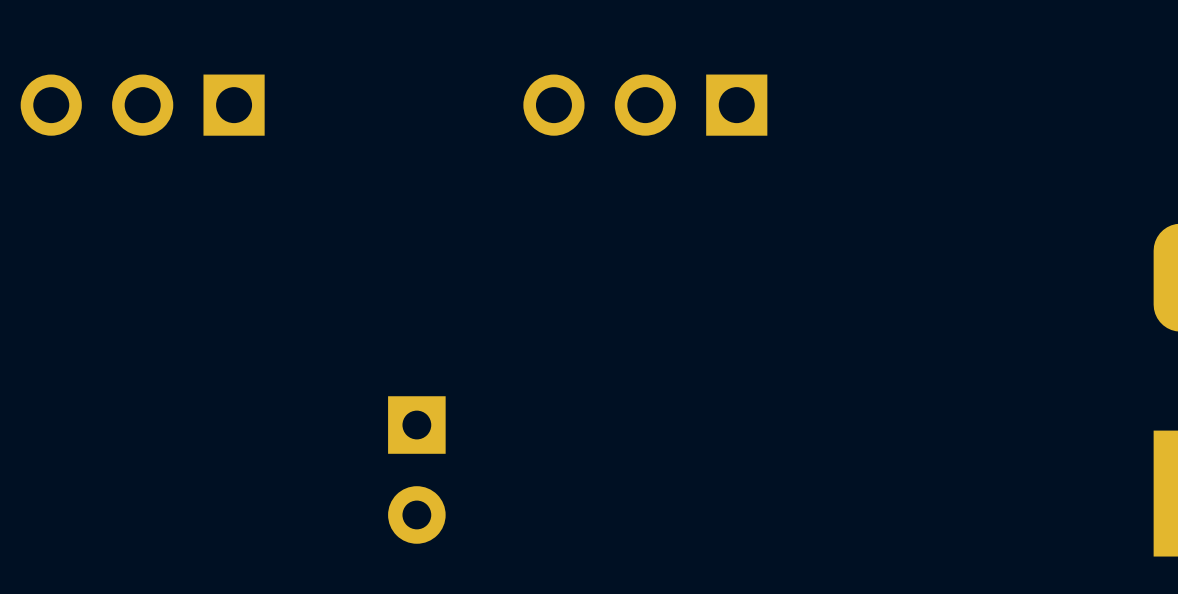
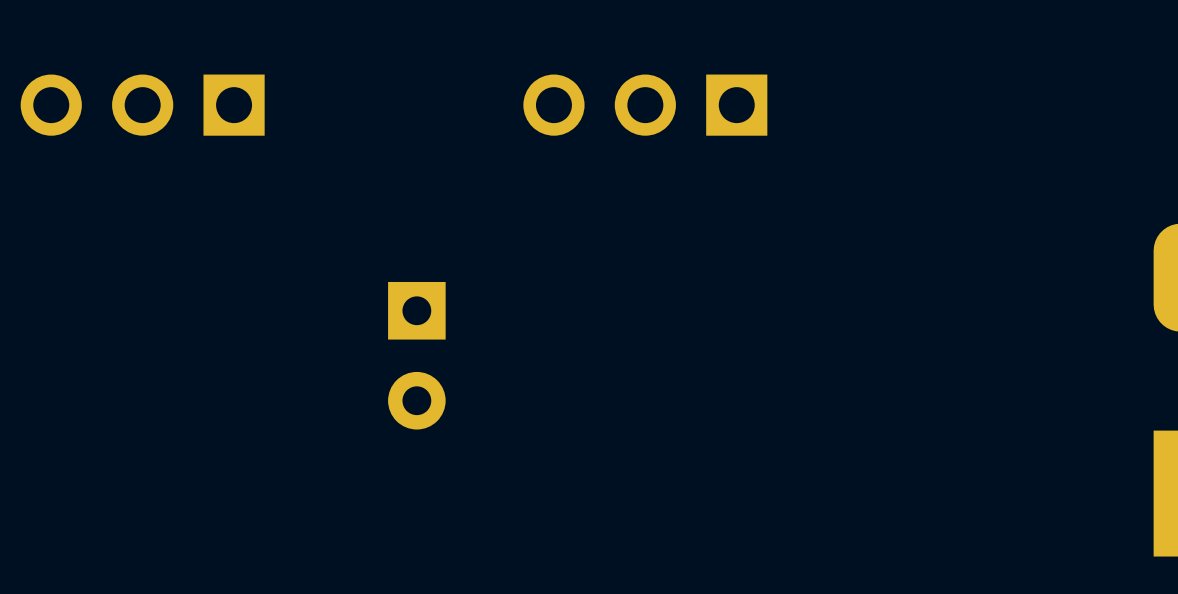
part position: (416, 469) -> (416, 355)

